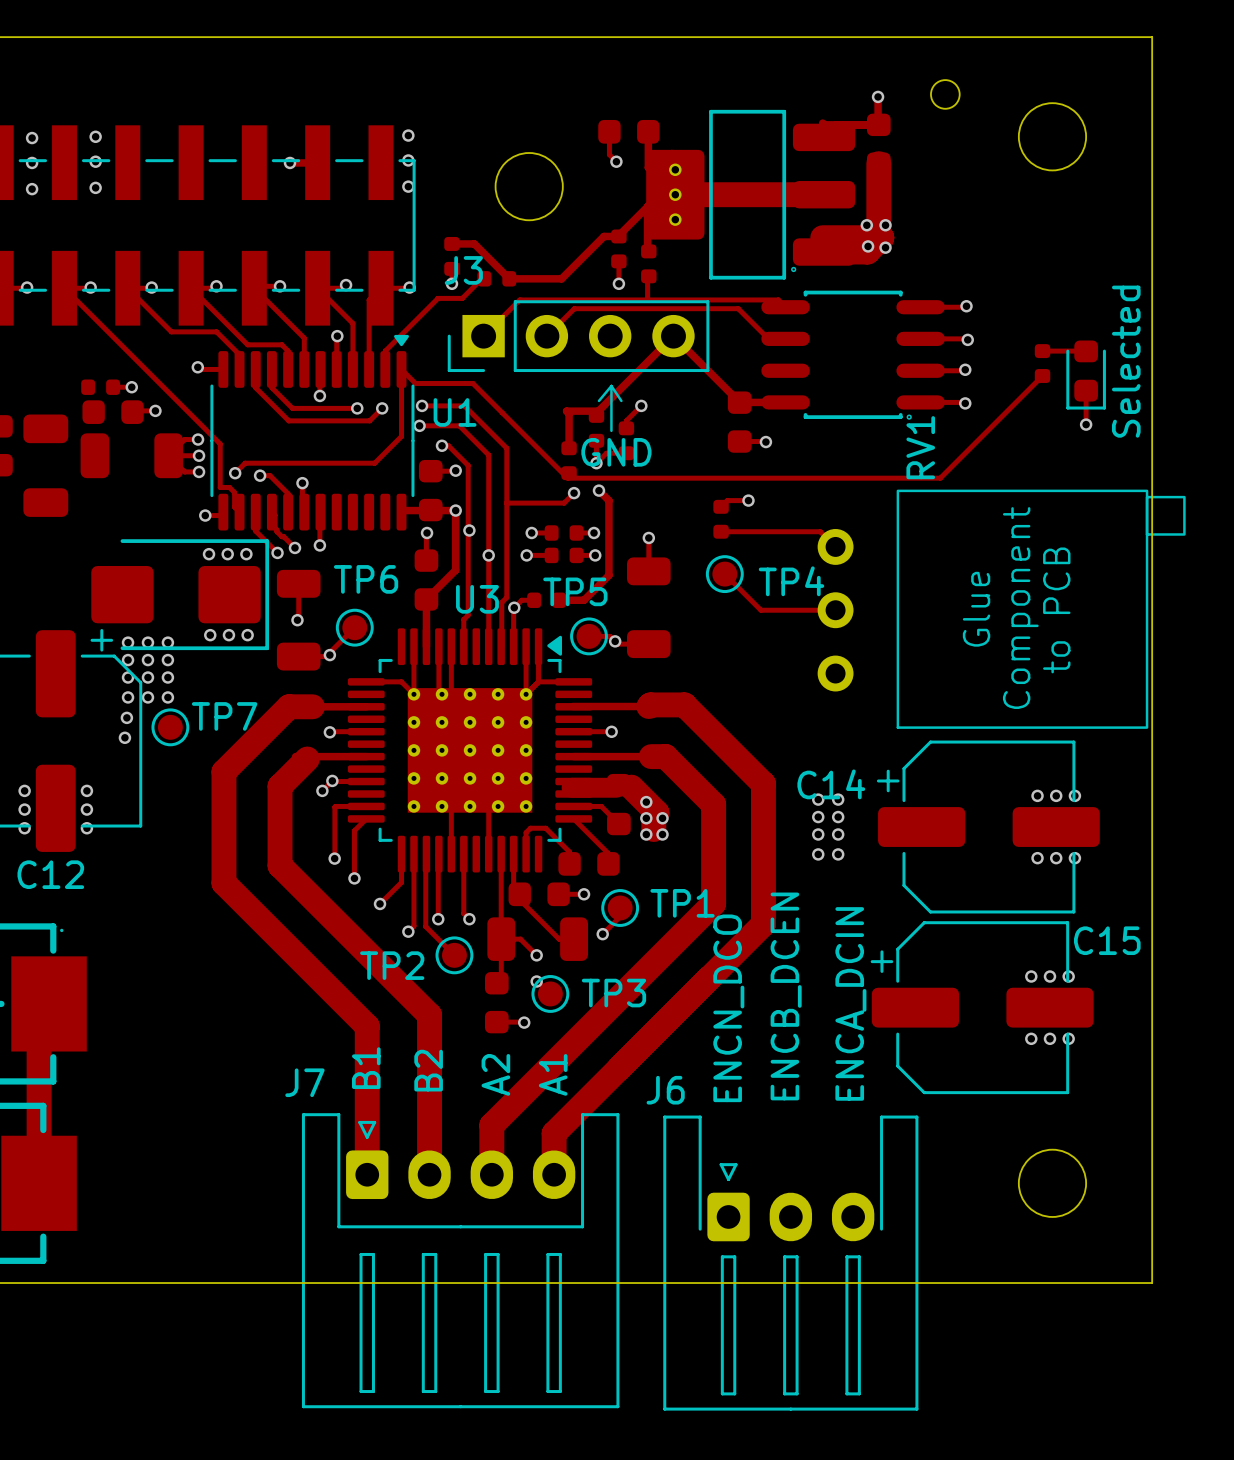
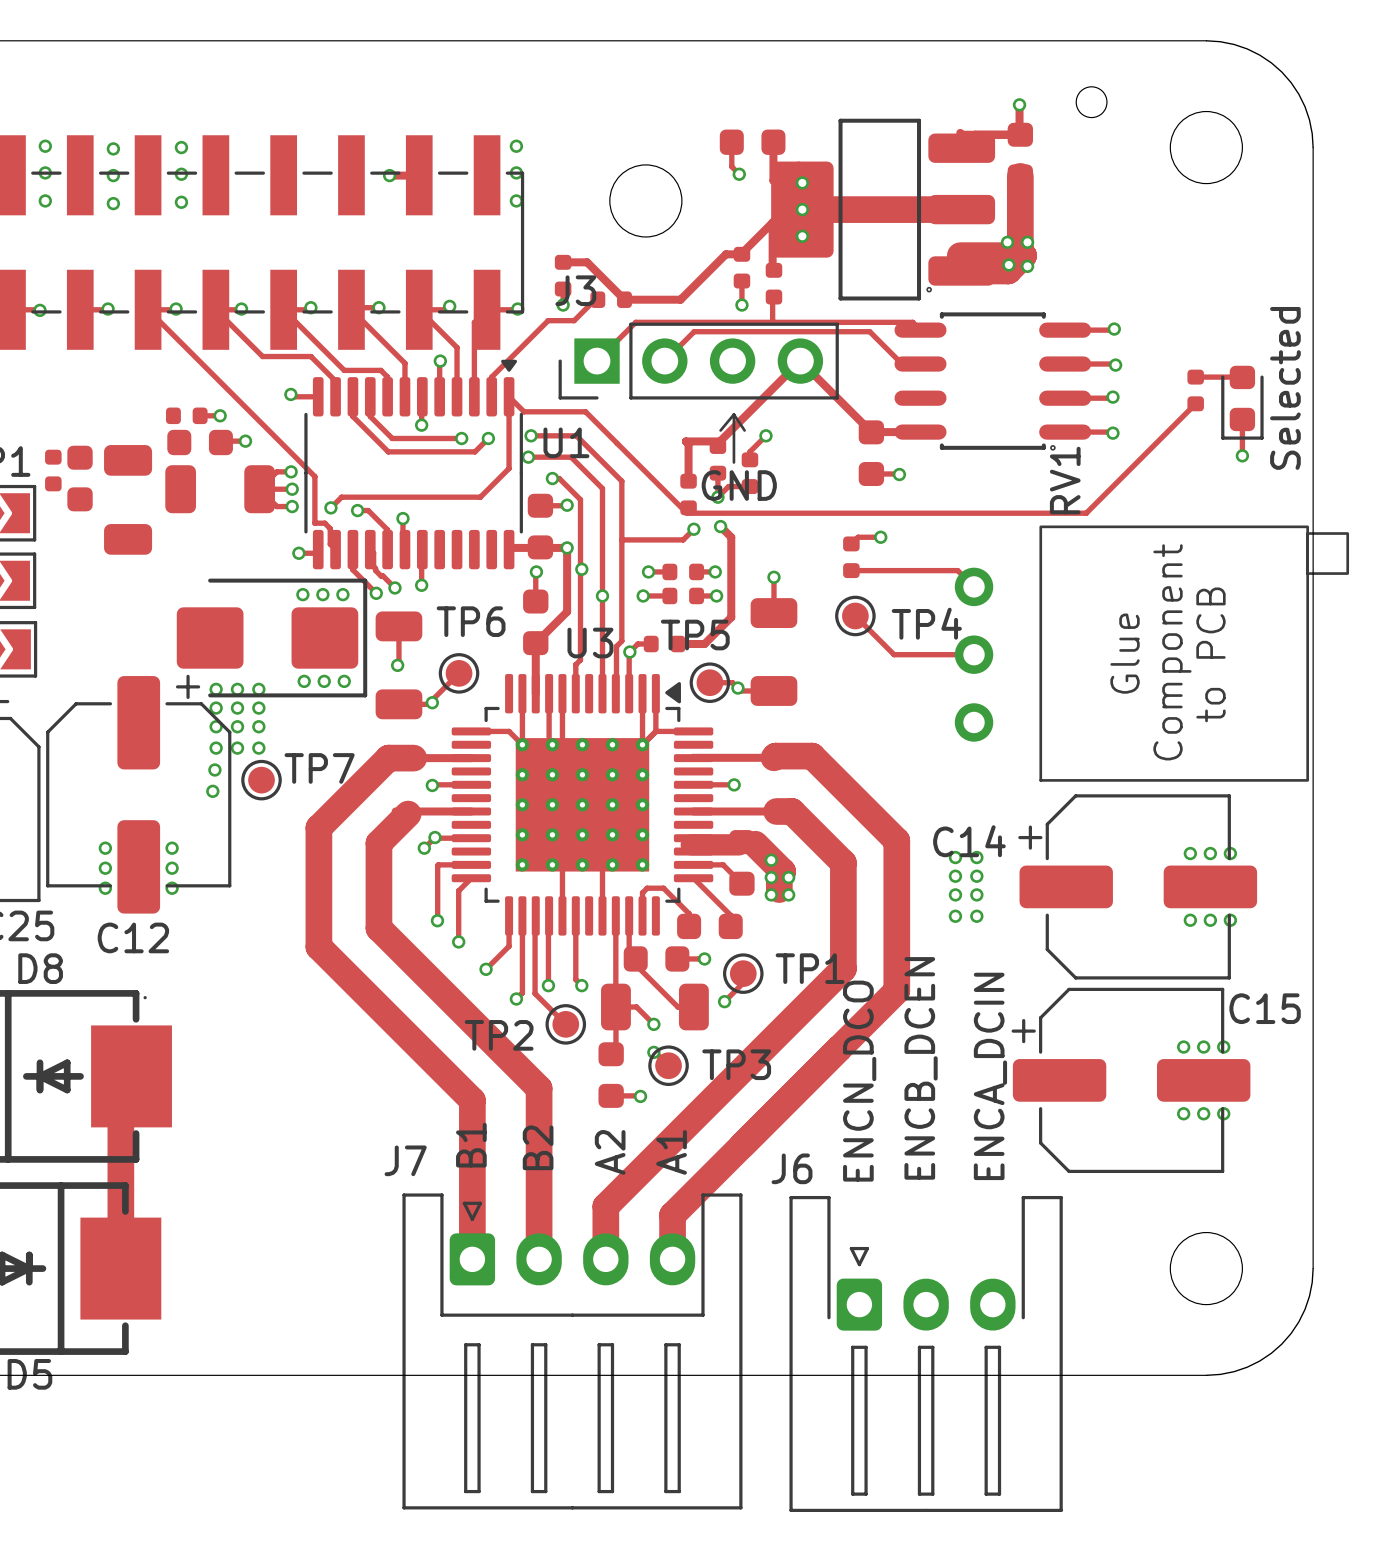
board edge: (1052, 37) (1152, 37) (1152, 136) -> (1206, 40) (1220, 41) (1247, 48) (1271, 62) (1281, 72) (1291, 82) (1305, 106) (1312, 133) (1313, 147)
board edge: (1152, 1183) (1152, 1283) (1052, 1283) -> (1313, 1268) (1309, 1296) (1305, 1309) (1298, 1321) (1281, 1344) (1271, 1353) (1247, 1367) (1234, 1371) (1206, 1375)

